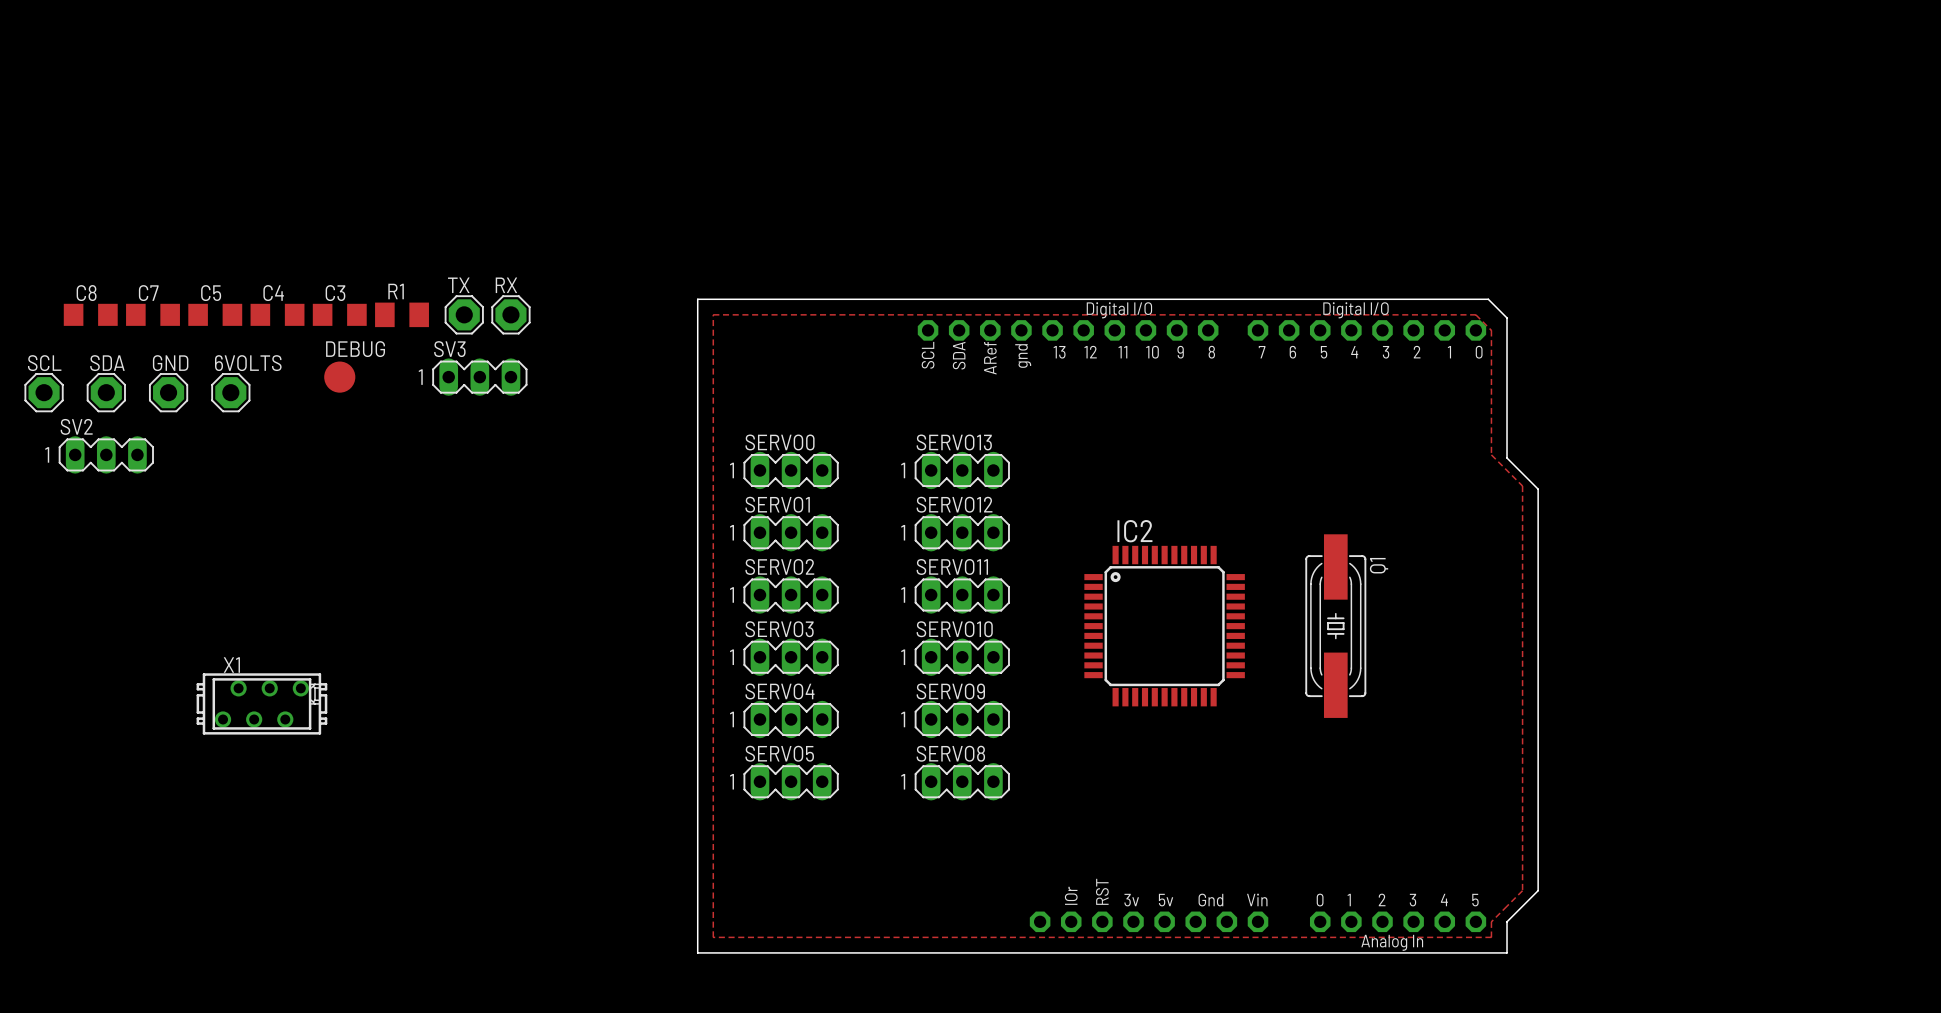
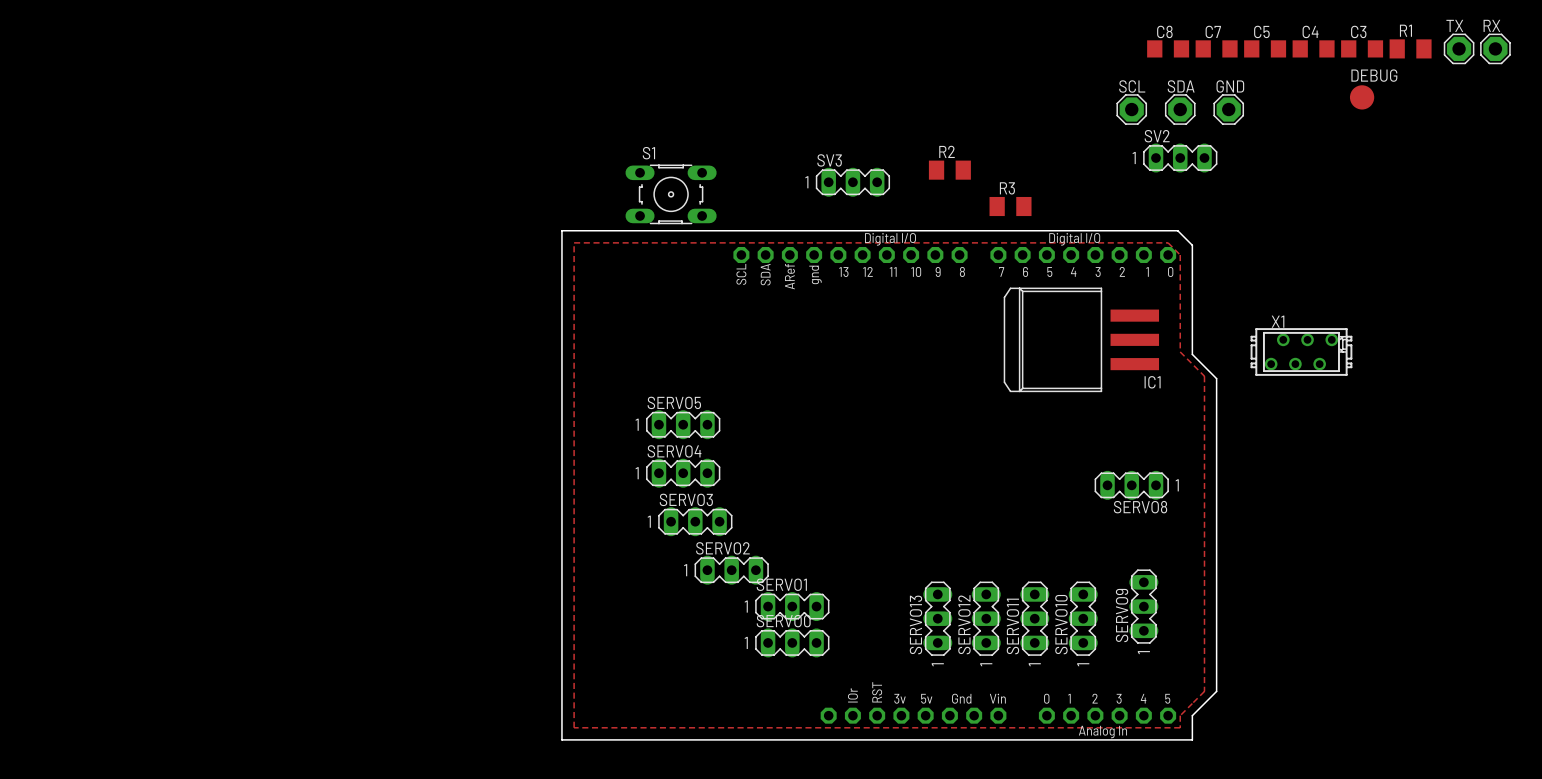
TX: none -> (1459, 48)
RX: none -> (1495, 48)
DEBUG: none -> (1362, 97)
SCL: none -> (1131, 109)
SDA: none -> (1180, 109)
GND: none -> (1228, 109)
R2: none -> (949, 170)
S1: none -> (671, 194)
R3: none -> (1010, 206)
C8 position: (90, 314) -> (1168, 48)
C7 position: (153, 314) -> (1216, 48)
C5 position: (215, 314) -> (1265, 48)
C4 position: (277, 314) -> (1313, 48)
C3 position: (339, 314) -> (1362, 48)
R1 position: (402, 314) -> (1410, 48)
TX: (464, 314) -> none
RX: (510, 314) -> none
DEBUG: (339, 377) -> none
SV3 position: (479, 377) -> (852, 182)
SCL: (44, 392) -> none
SDA: (106, 392) -> none
GND: (168, 392) -> none
6VOLTS: (230, 392) -> none
IC1: none -> (1081, 339)
SV2 position: (106, 454) -> (1180, 158)
SERVO0 position: (791, 470) -> (792, 642)
SERVO13 rotation: 0° (962, 470) -> 90° counterclockwise (937, 618)
SERVO13 position: (962, 470) -> (937, 618)
SERVO1 position: (791, 532) -> (792, 606)
SERVO12 rotation: 0° (962, 532) -> 90° counterclockwise (986, 618)
SERVO12 position: (962, 532) -> (986, 618)
SERVO2 position: (791, 594) -> (731, 570)
SERVO11 rotation: 0° (962, 594) -> 90° counterclockwise (1034, 618)
SERVO11 position: (962, 594) -> (1034, 618)
IC2: (1164, 626) -> none
Q1: (1335, 626) -> none
SERVO3 position: (791, 657) -> (695, 521)
SERVO10 rotation: 0° (962, 657) -> 90° counterclockwise (1083, 618)
SERVO10 position: (962, 657) -> (1083, 618)
X1 position: (261, 703) -> (1301, 351)
SERVO4 position: (791, 719) -> (683, 473)
SERVO9 rotation: 0° (962, 719) -> 90° counterclockwise (1143, 606)
SERVO9 position: (962, 719) -> (1143, 606)
SERVO8 name position: SERVO8 (950, 753) -> SERVO8 (1140, 507)
SERVO5 position: (791, 781) -> (683, 424)
SERVO8 text position: 1 (903, 781) -> 1 (1177, 485)
SERVO8 position: (962, 781) -> (1131, 485)

